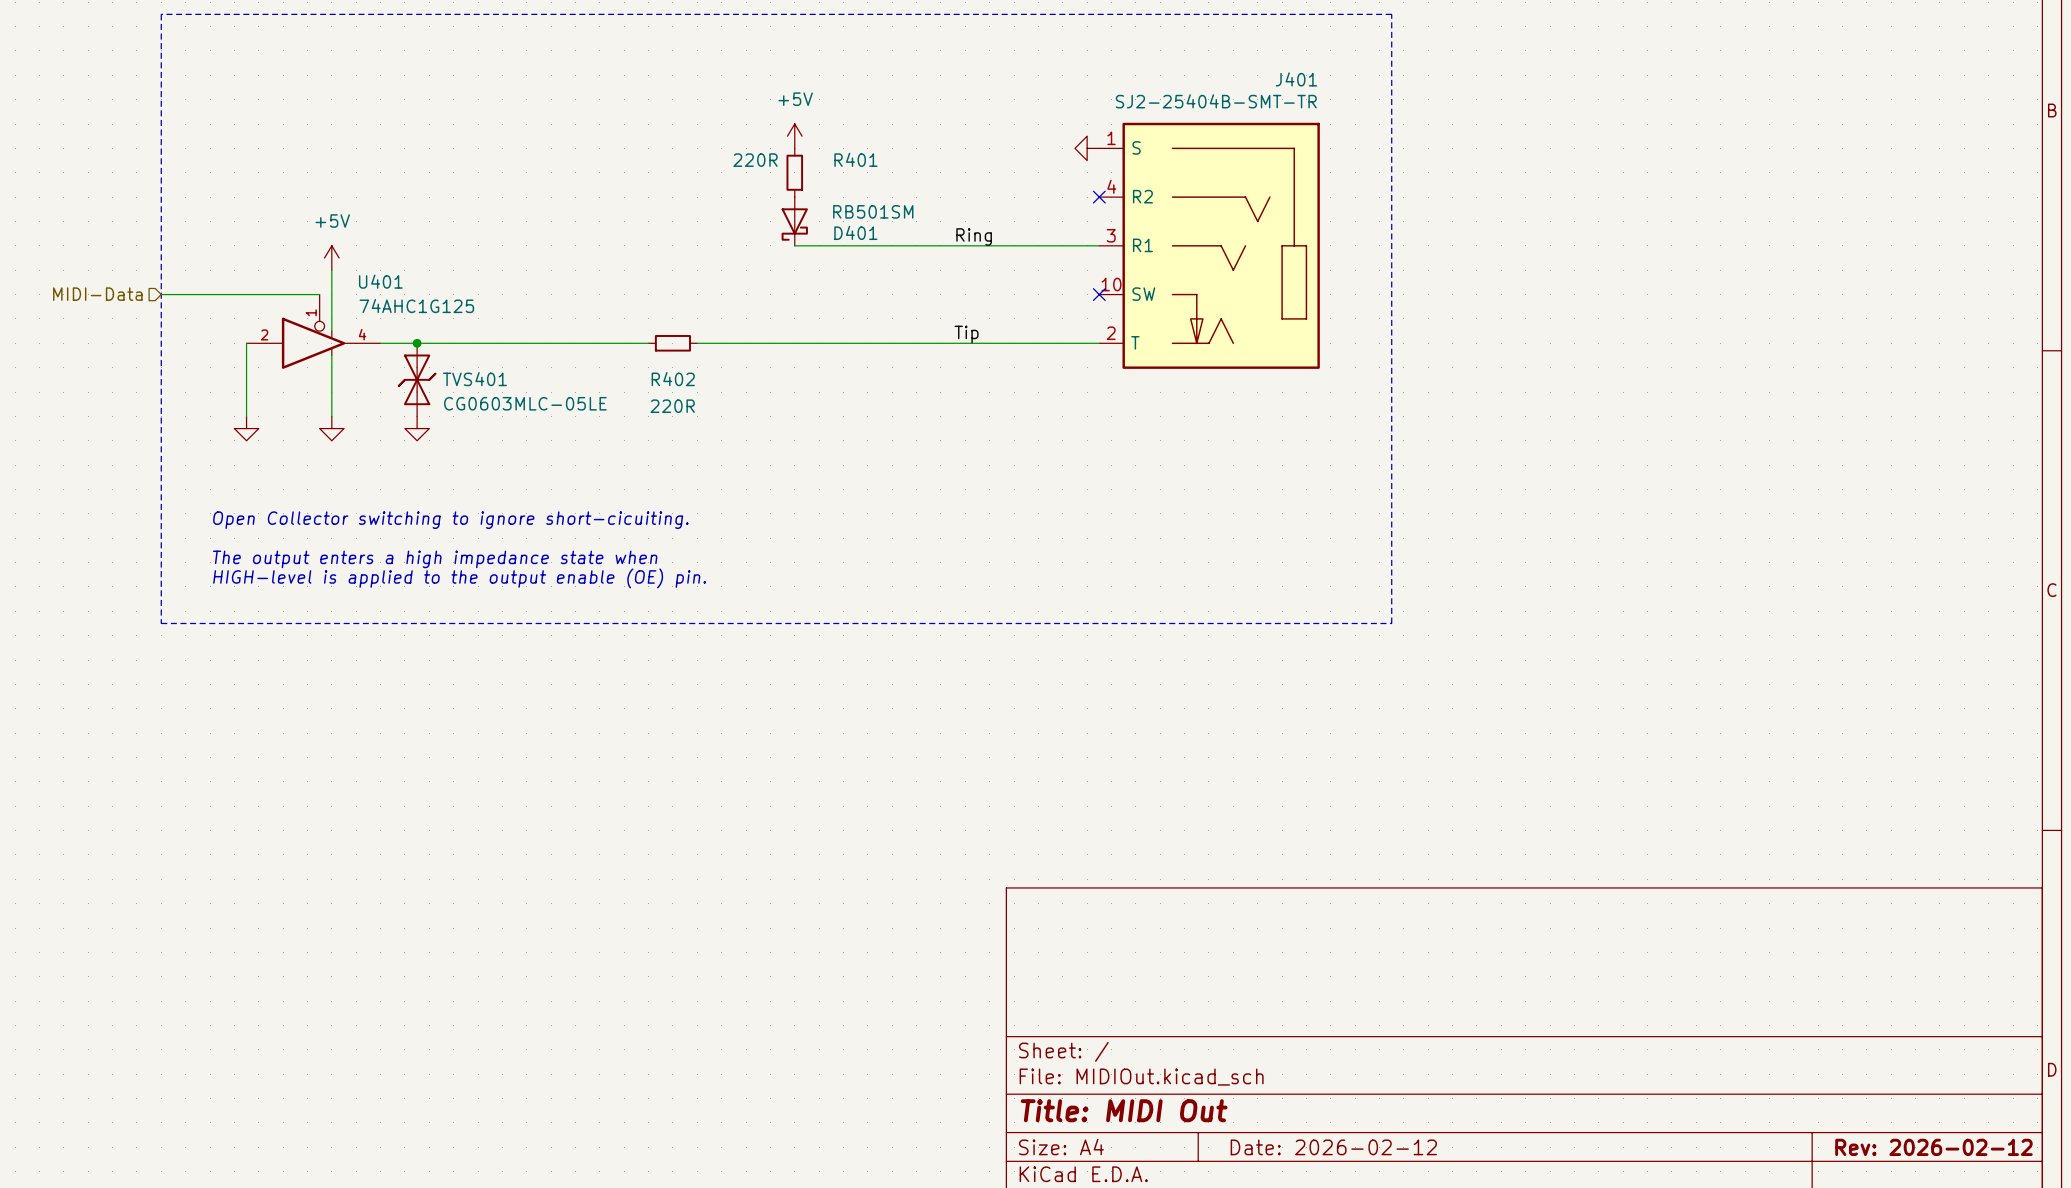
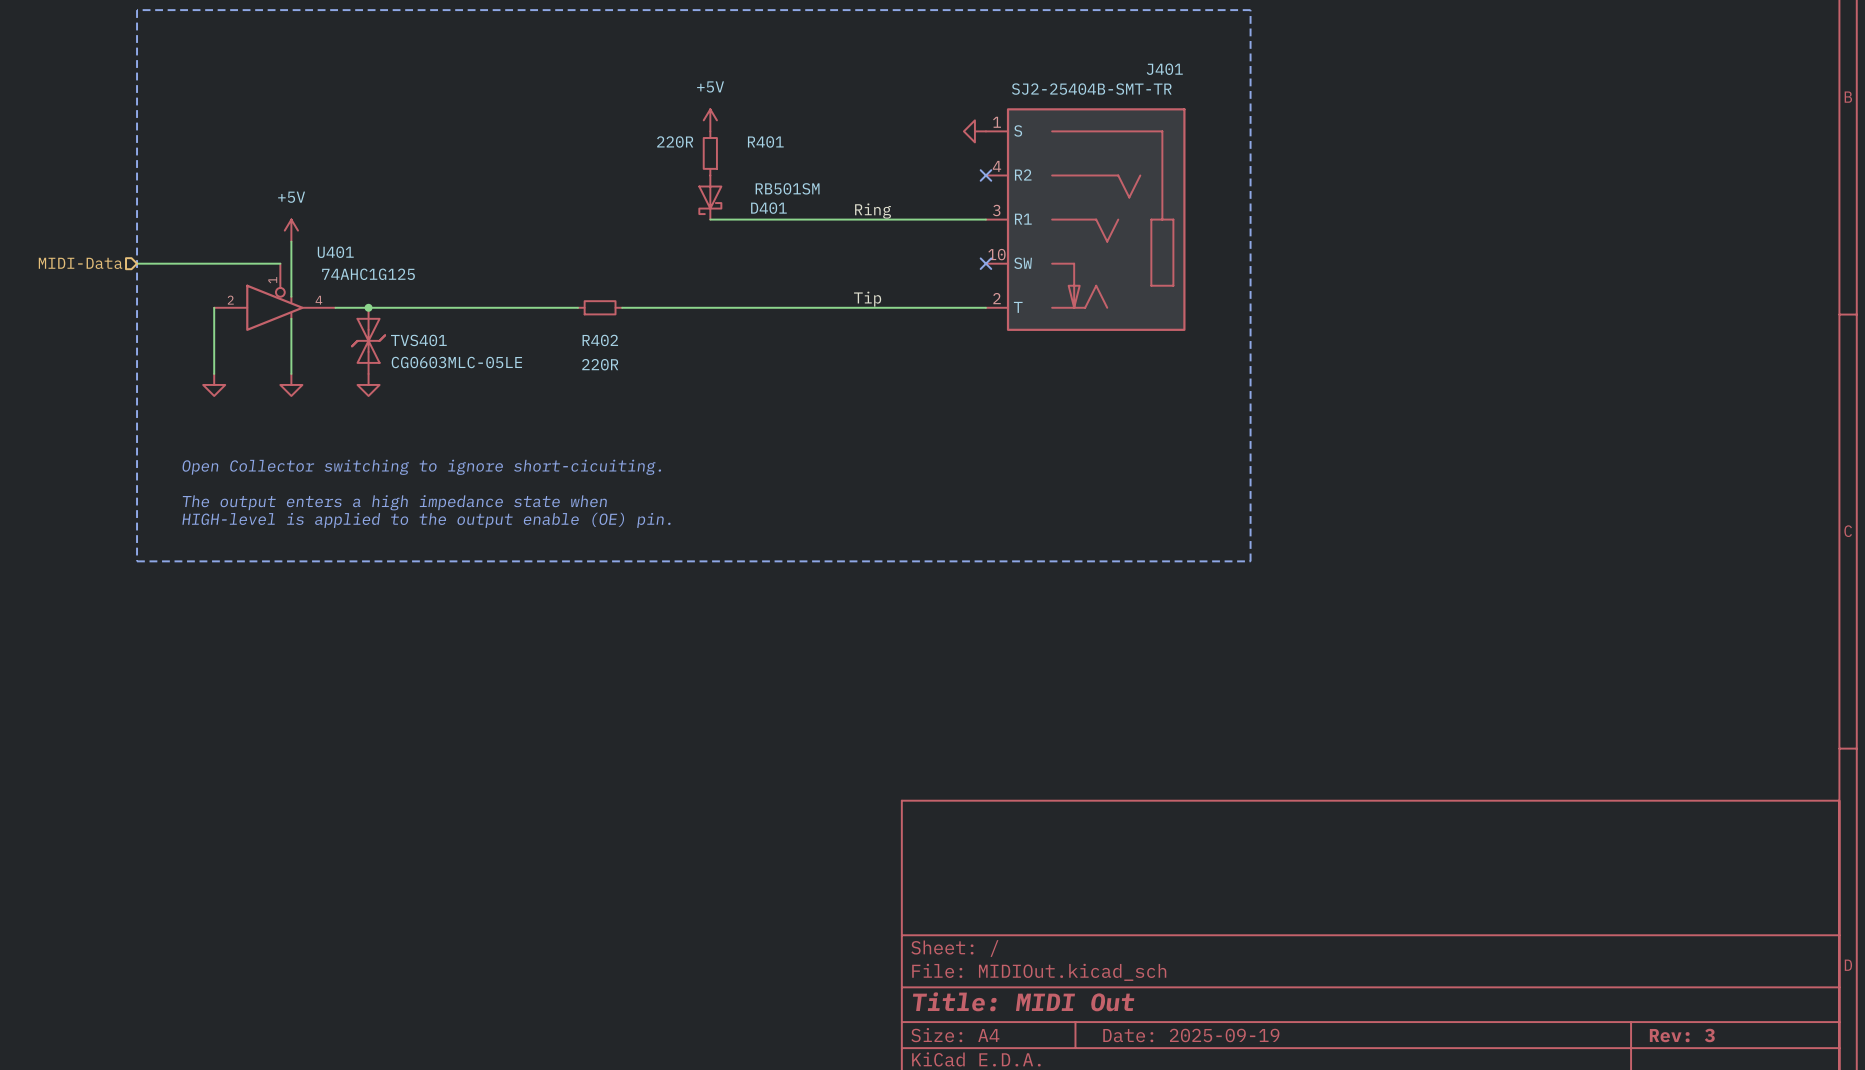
title block: Date: 2026-02-12 (1333, 1147) -> Date: 2025-09-19 (1191, 1035)
title block: Rev: 2026-02-12 (1933, 1147) -> Rev: 3 (1682, 1035)

